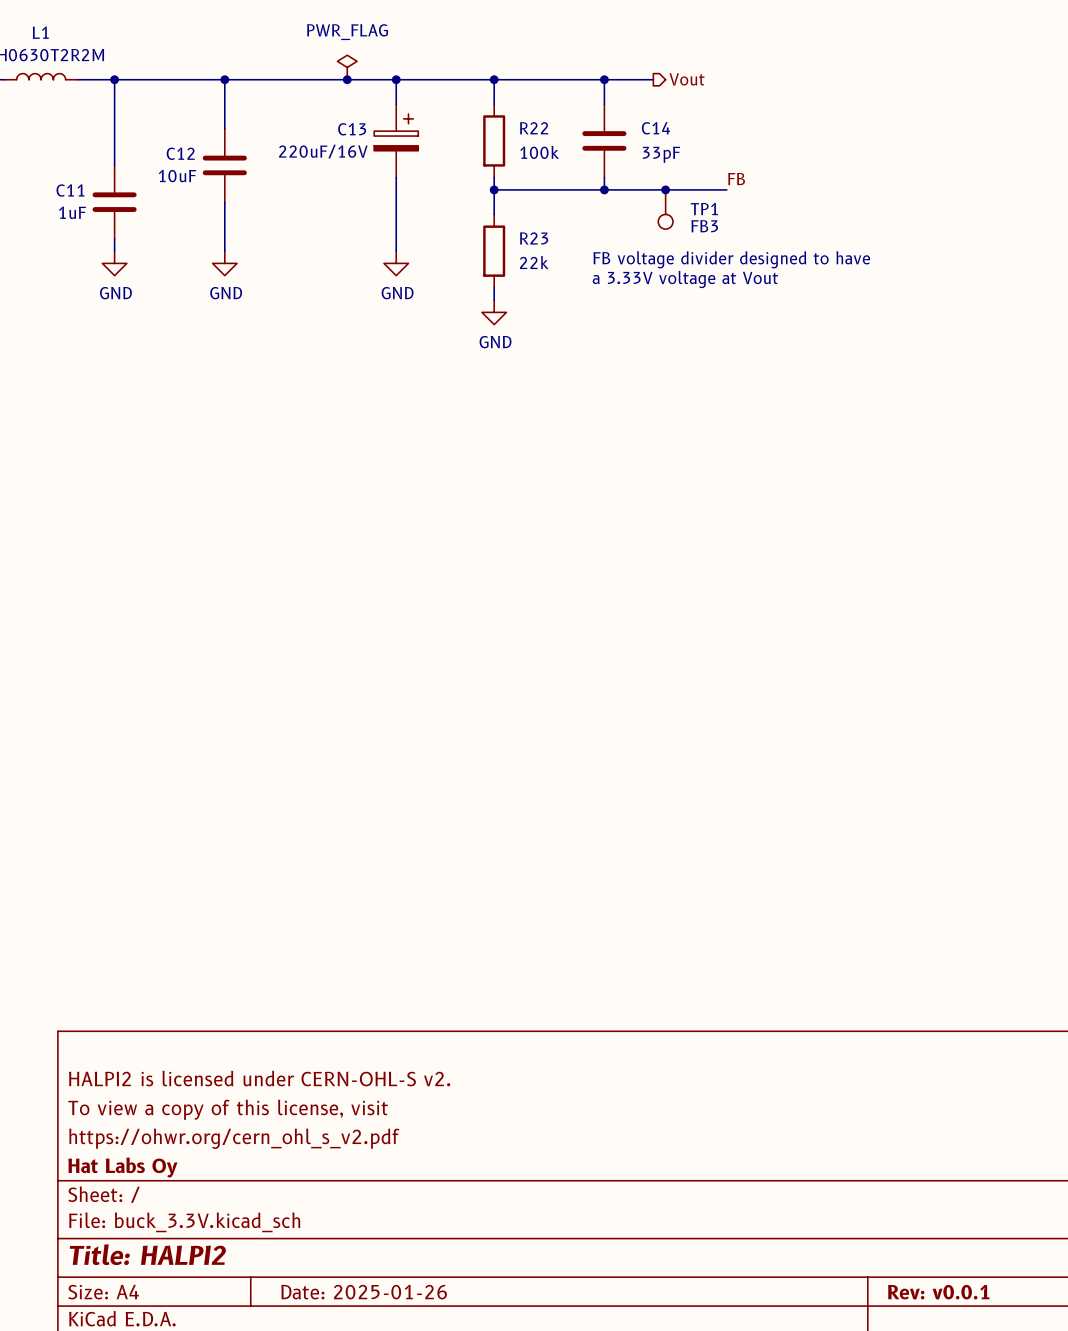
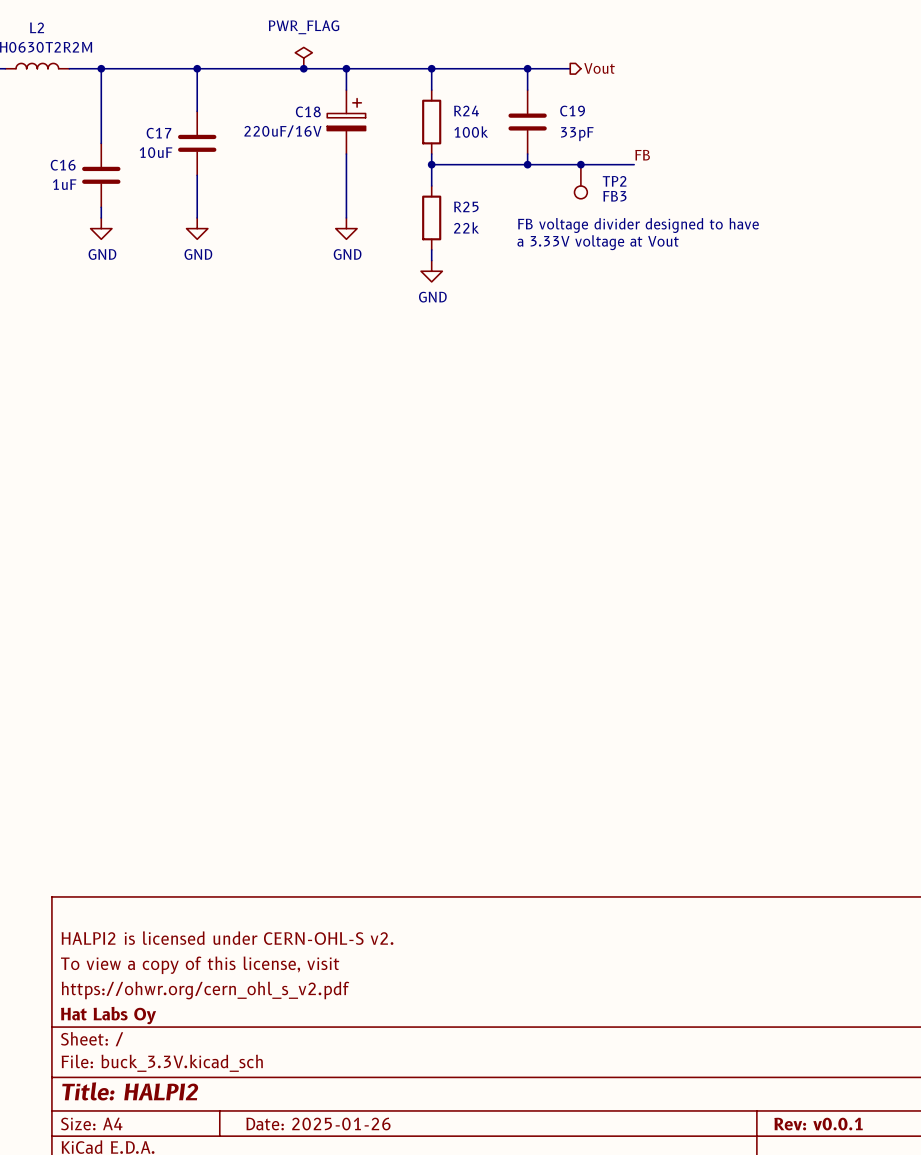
L1 name: L1 (40, 32) -> L2 (37, 27)
R22 name: R22 (534, 128) -> R24 (466, 110)
C14 name: C14 (656, 128) -> C19 (572, 111)
C13 name: C13 (352, 129) -> C18 (308, 111)
C12 name: C12 (180, 153) -> C17 (158, 133)
C11 name: C11 (70, 190) -> C16 (63, 165)
TP1 name: TP1 (704, 209) -> TP2 (614, 181)
R23 name: R23 (534, 238) -> R25 (466, 206)

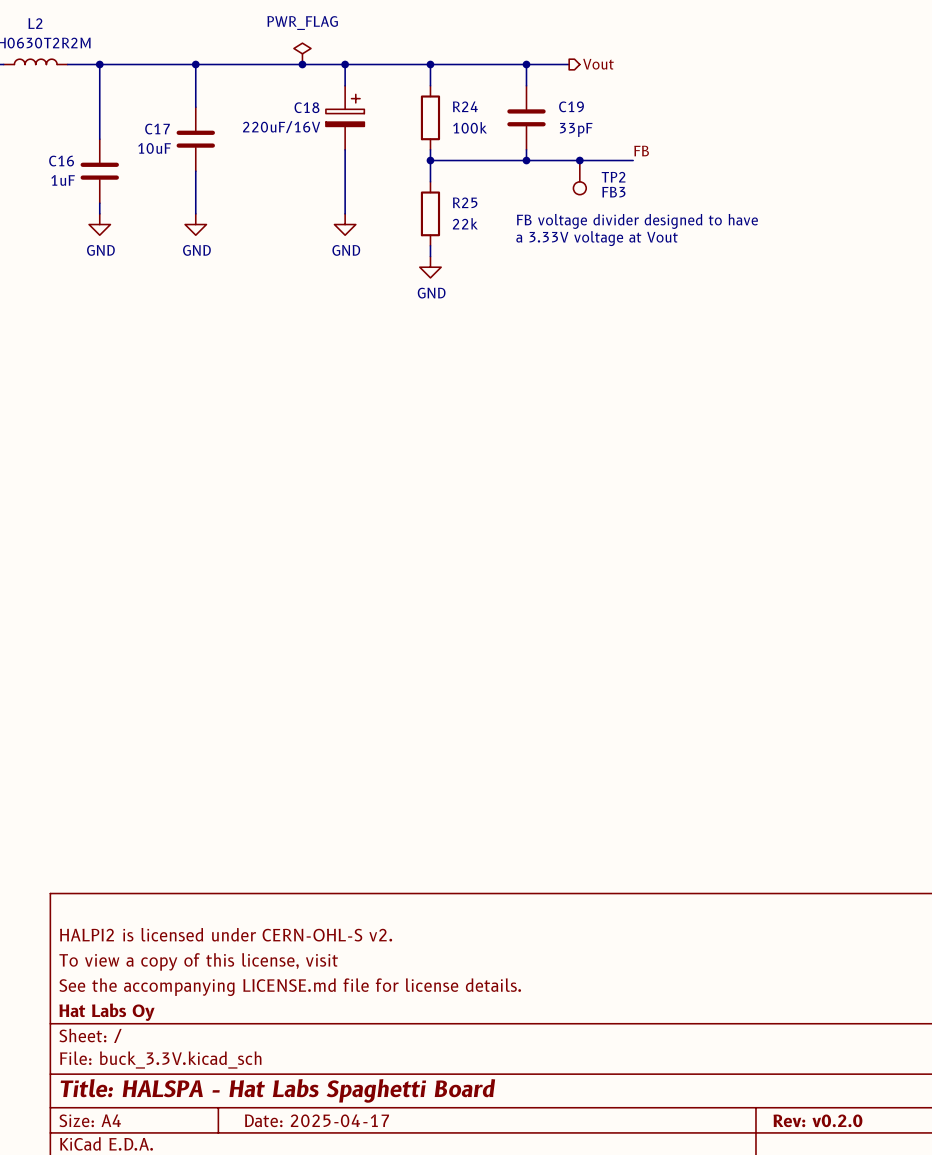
title block: https://ohwr.org/cern_ohl_s_v2.pdf (205, 990) -> See the accompanying LICENSE.md file for license details. (290, 987)
title block: Title: HALPI2 (130, 1091) -> Title: HALSPA - Hat Labs Spaghetti Board (277, 1090)
title block: Date: 2025-01-26 (318, 1124) -> Date: 2025-04-17 (317, 1120)
title block: Rev: v0.0.1 (818, 1124) -> Rev: v0.2.0 (817, 1120)

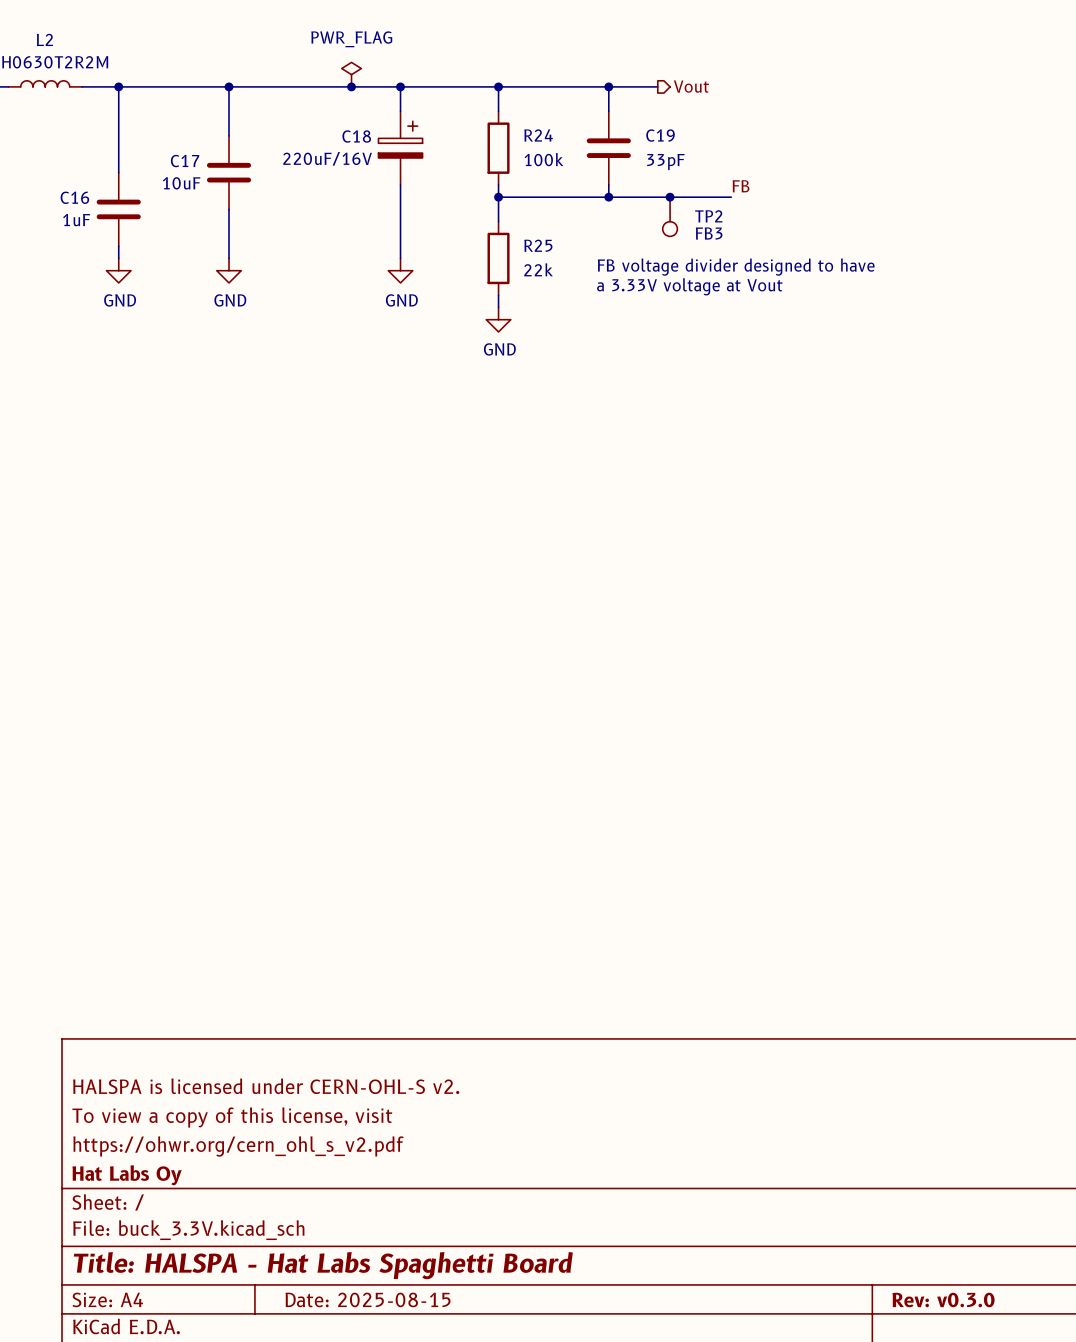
title block: HALPI2 is licensed under CERN-OHL-S v2. (226, 934) -> HALSPA is licensed under CERN-OHL-S v2. (266, 1086)
title block: See the accompanying LICENSE.md file for license details. (290, 987) -> https://ohwr.org/cern_ohl_s_v2.pdf (238, 1146)
title block: Date: 2025-04-17 (317, 1120) -> Date: 2025-08-15 (368, 1299)
title block: Rev: v0.2.0 (817, 1120) -> Rev: v0.3.0 (943, 1300)

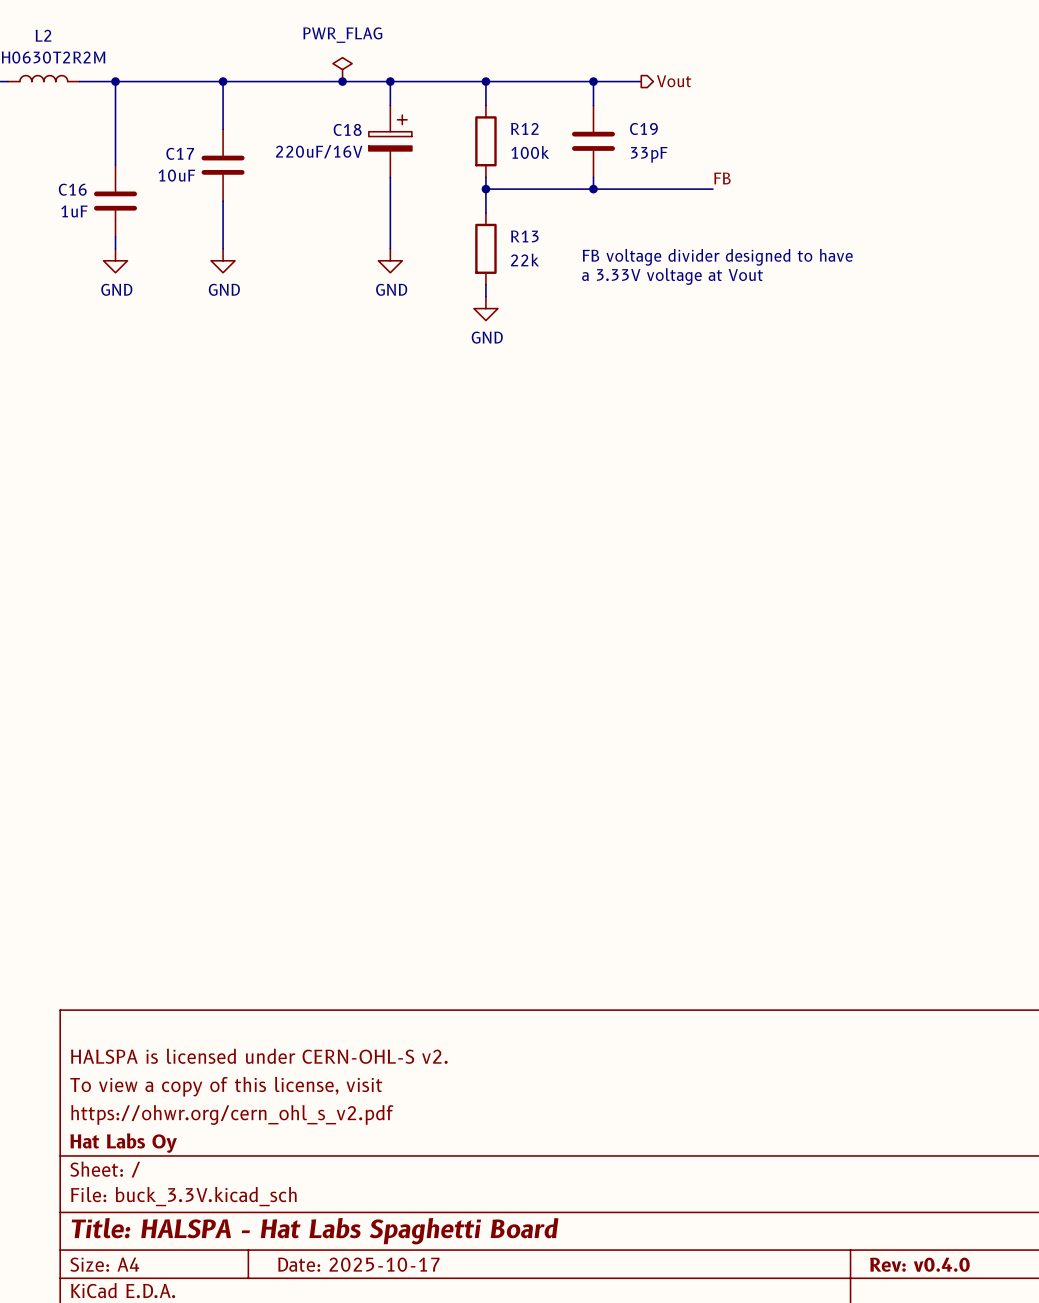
R24 name: R24 (538, 135) -> R12 (524, 128)
junction: (670, 197) -> none
TP2: FB3 (670, 216) -> none
R25 name: R25 (538, 245) -> R13 (524, 236)
title block: Date: 2025-08-15 (368, 1299) -> Date: 2025-10-17 (358, 1264)
title block: Rev: v0.3.0 (943, 1300) -> Rev: v0.4.0 (919, 1264)

